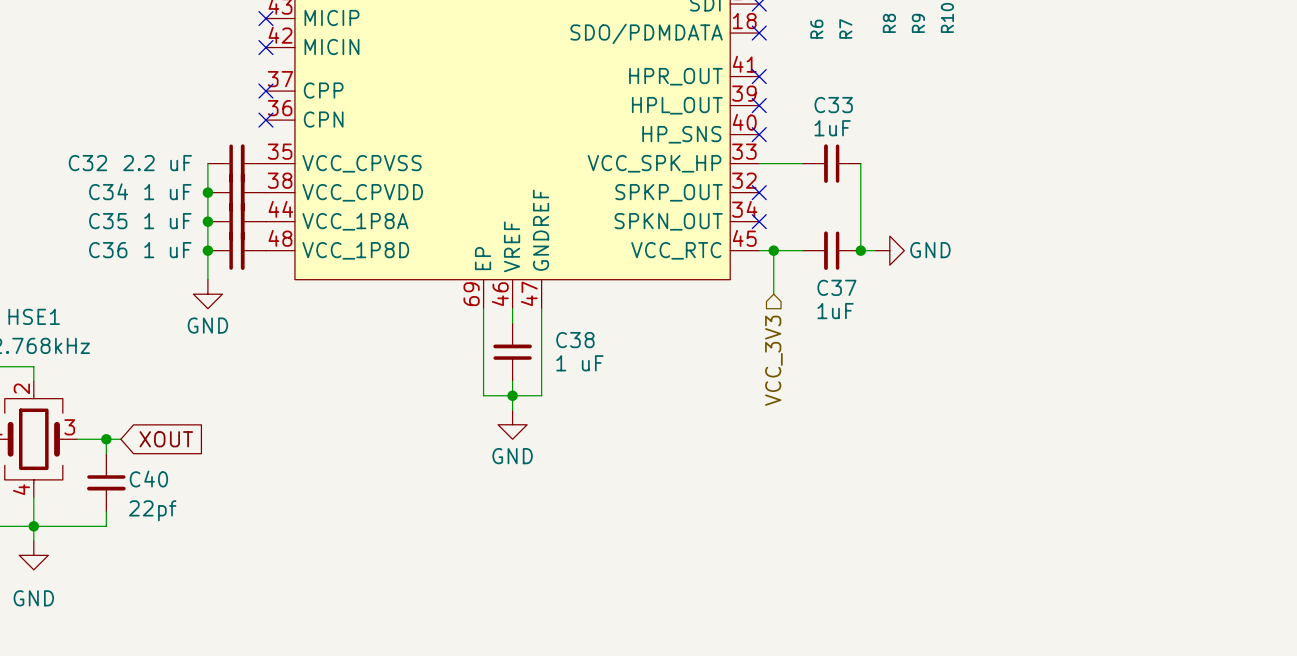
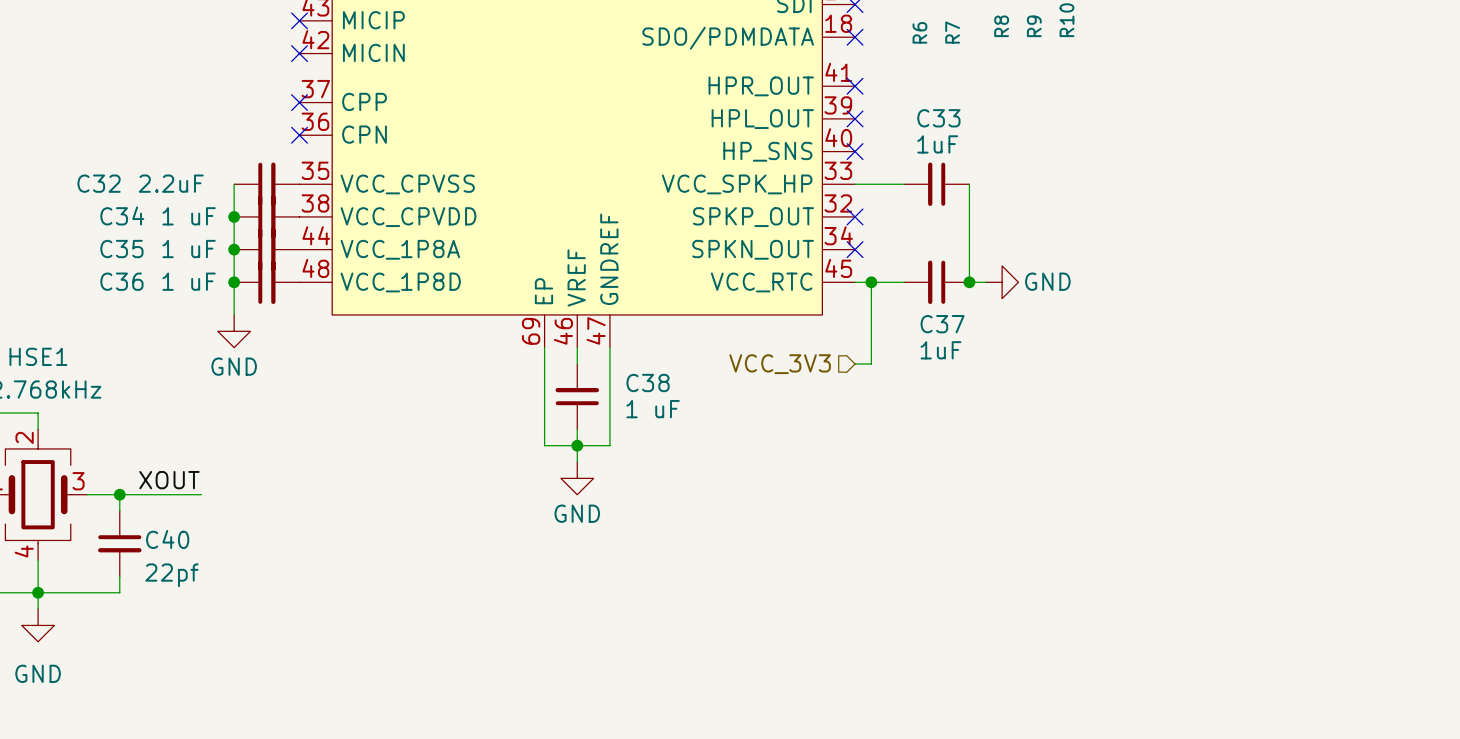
C32 value: 2.2 uF (157, 163) -> 2.2uF (171, 183)
wire: none -> (871, 331) (871, 364) (855, 364)
hierarchical label rotation: 0° (773, 360) -> 90° clockwise (780, 364)
label: none -> XOUT (169, 480)
wire: none -> (136, 494) (201, 494)
global label: XOUT (166, 439) -> none

